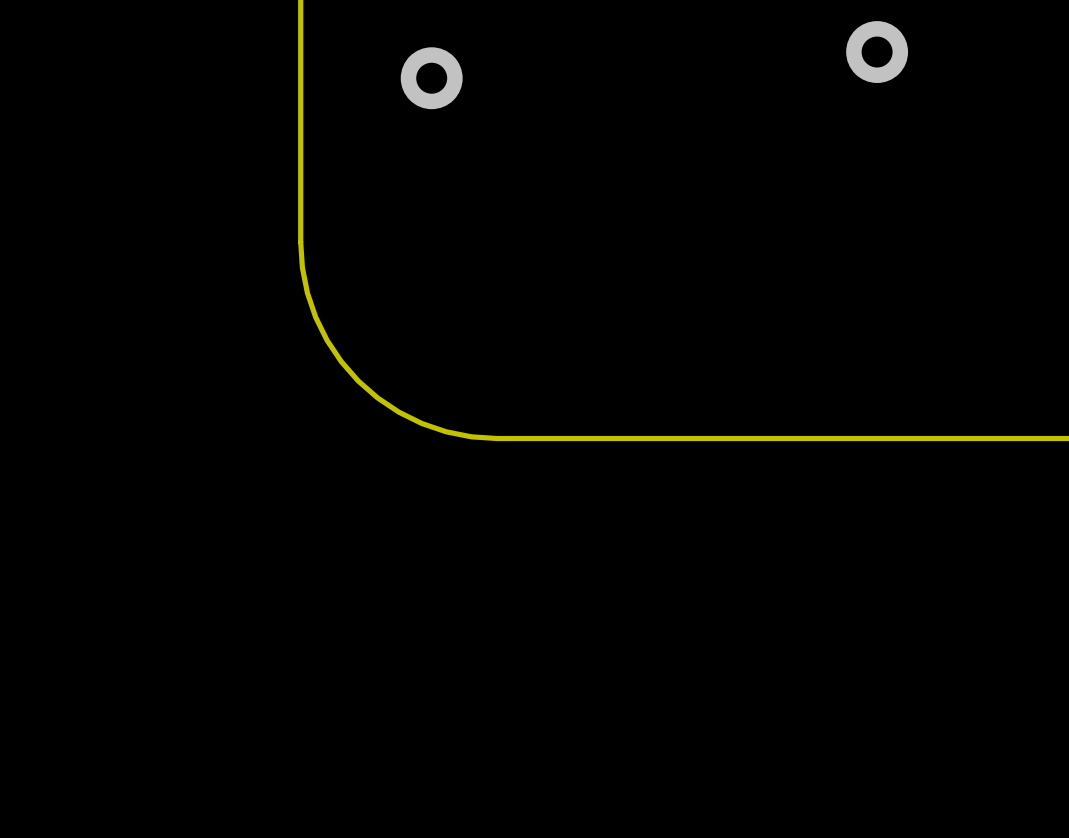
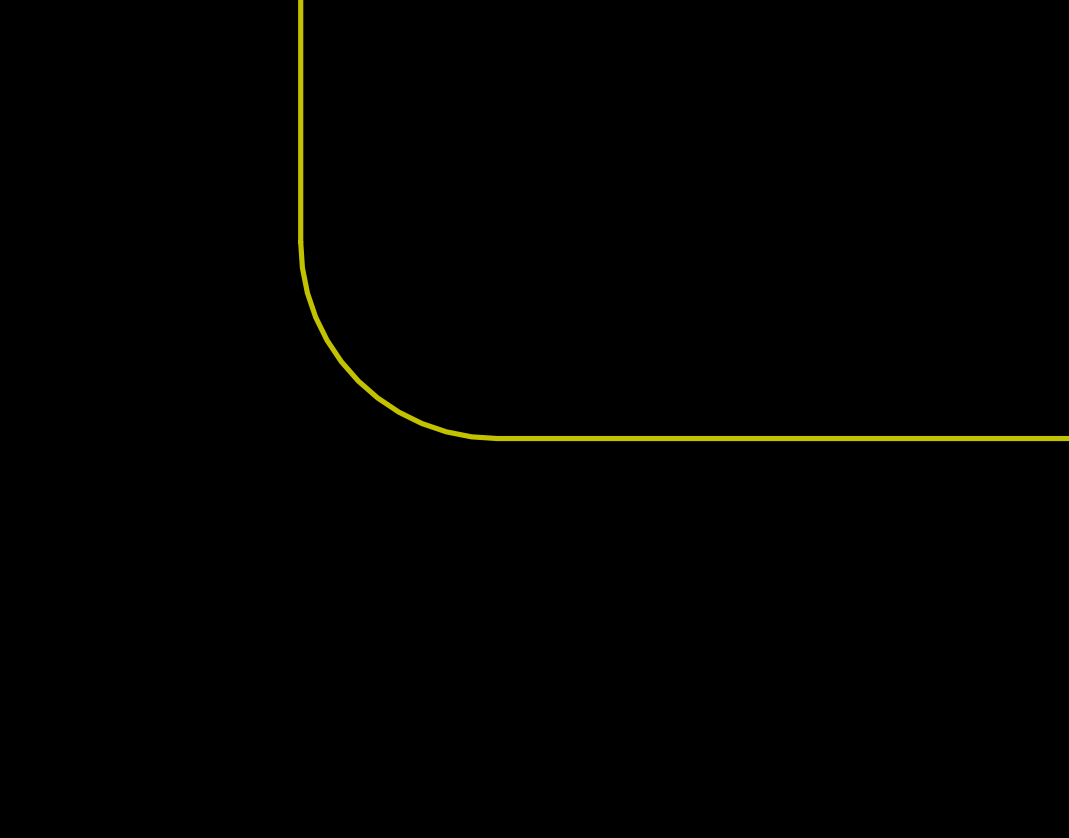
via: (877, 52) -> none
via: (431, 78) -> none

